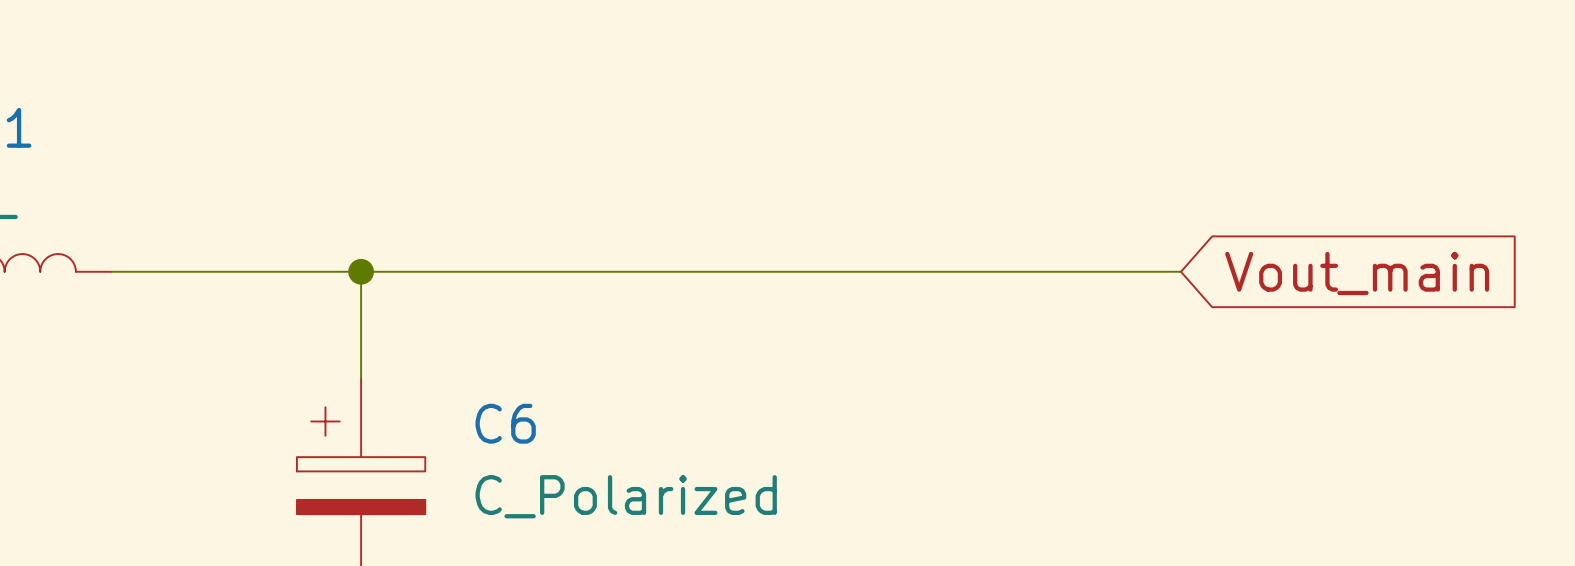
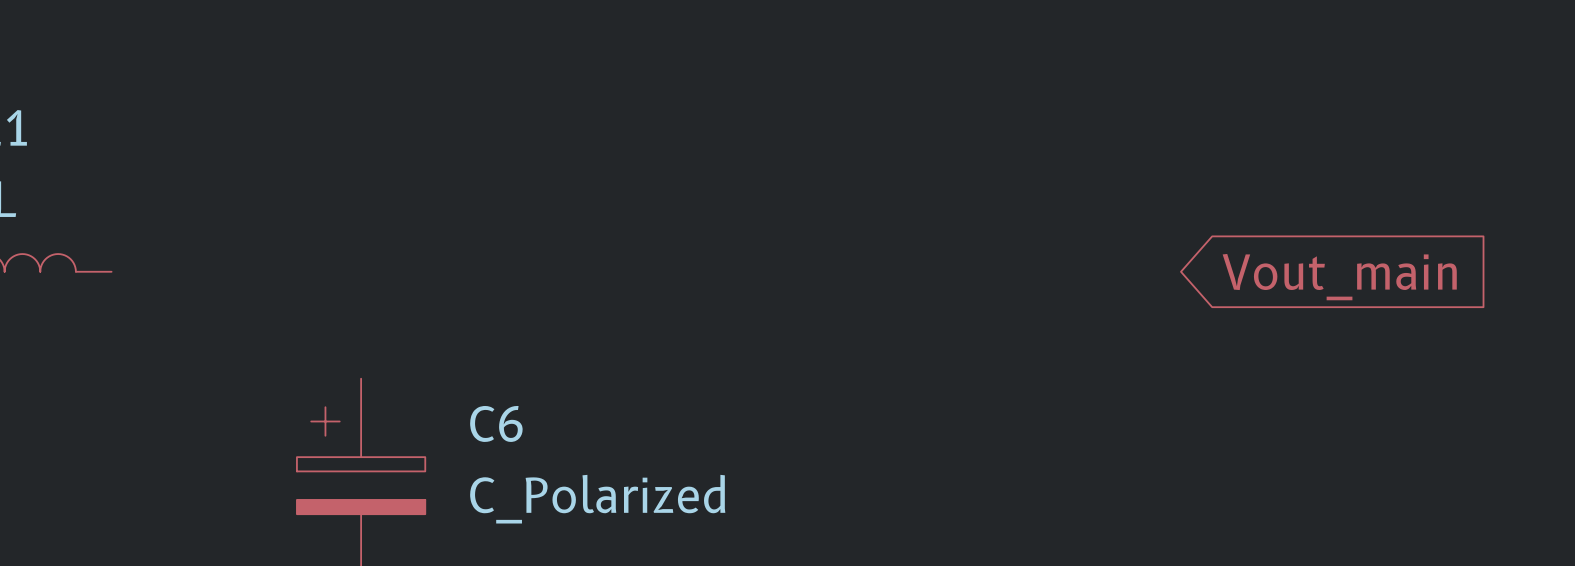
wire: (111, 271) (1180, 271) -> none
wire: (361, 271) (361, 378) -> none
junction: (361, 271) -> none

